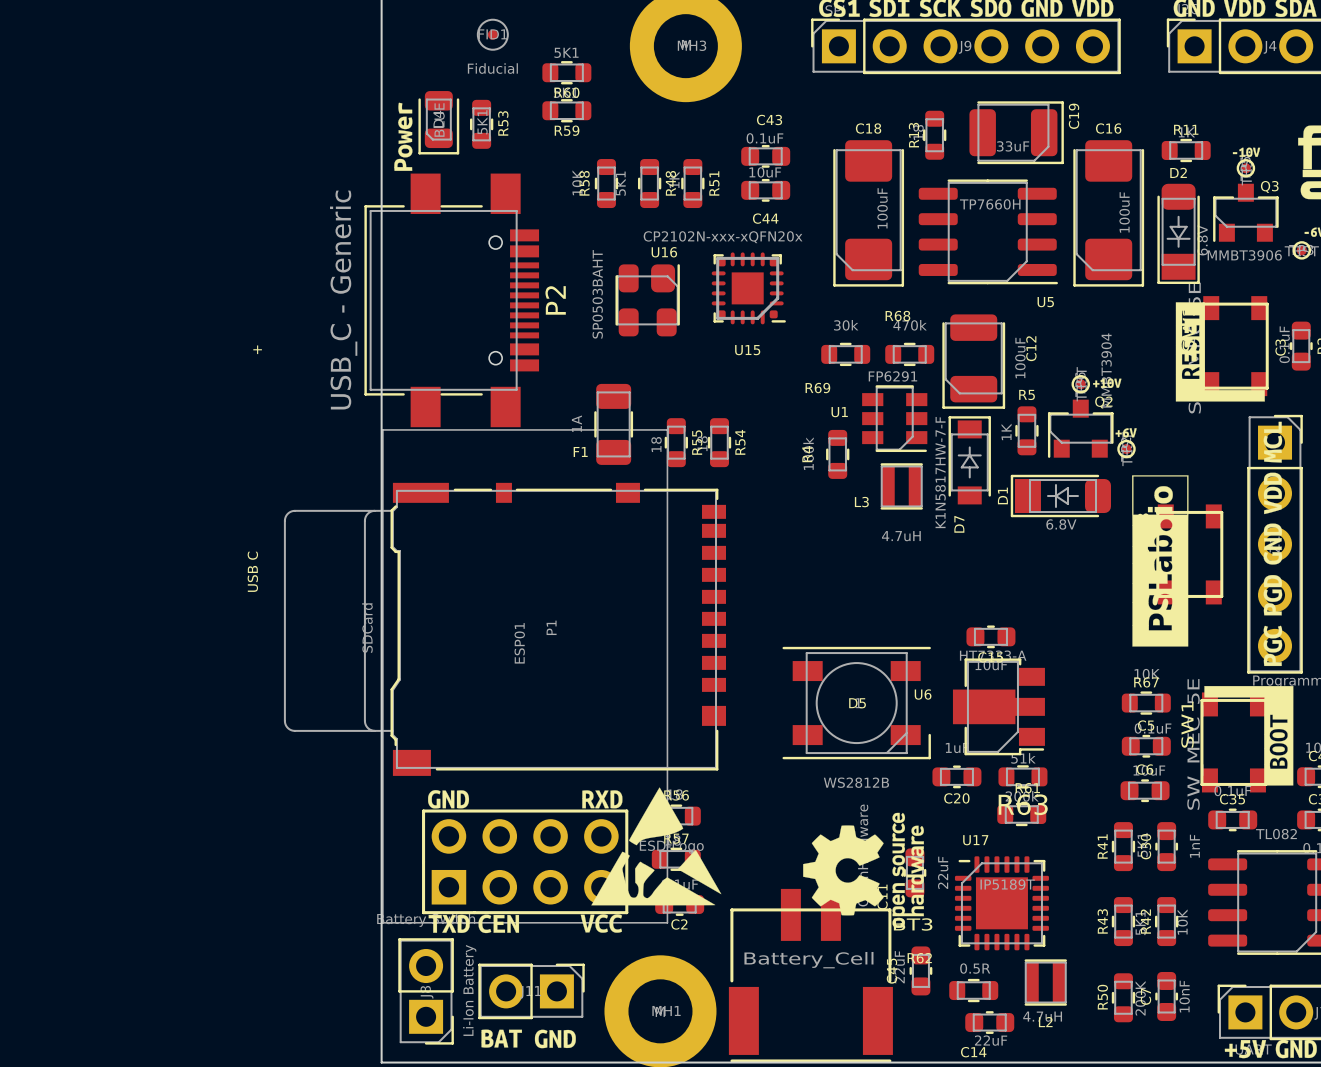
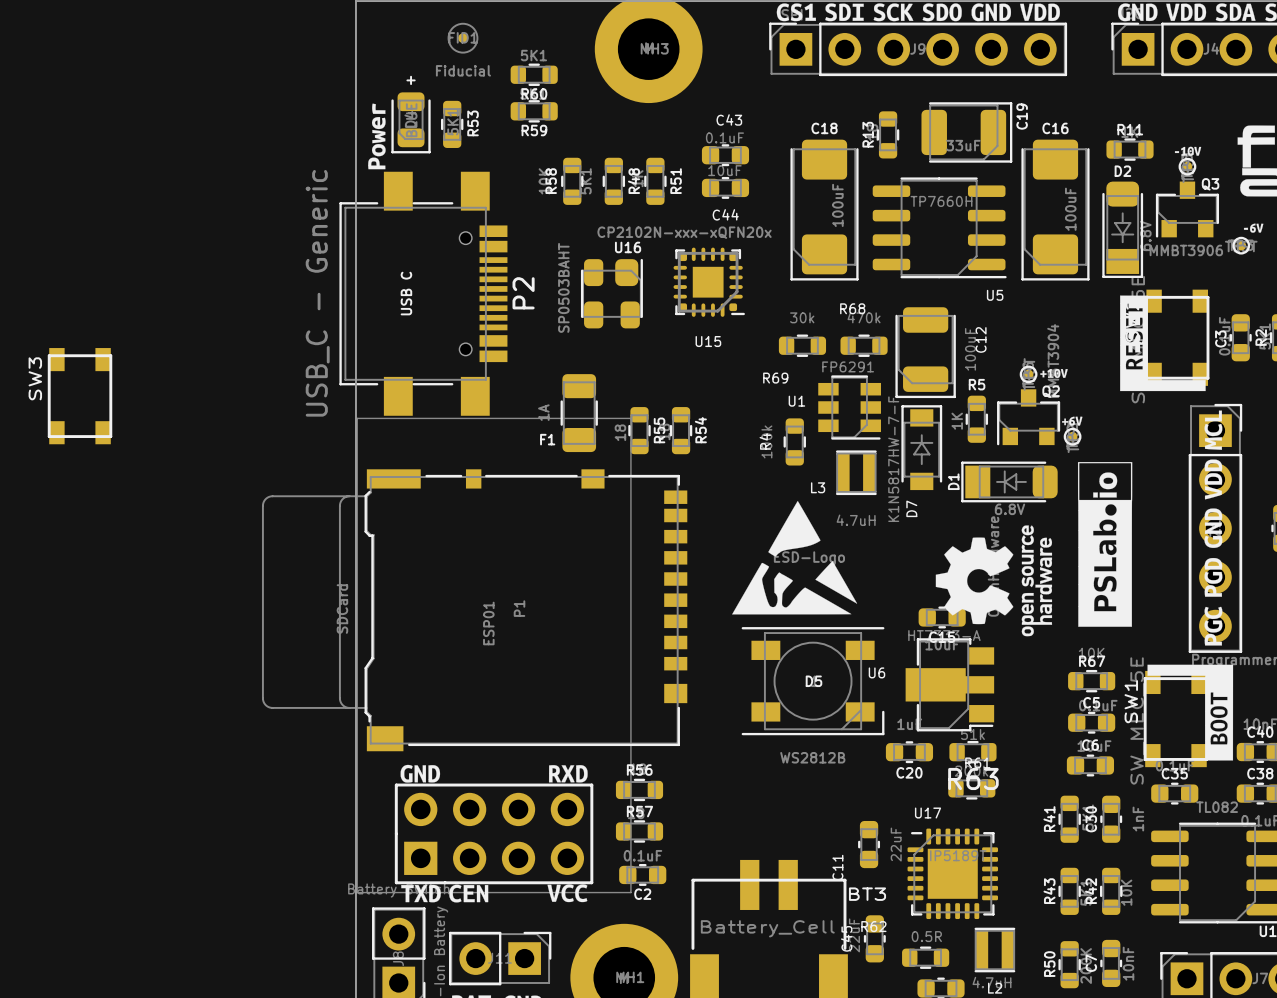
text position: + (257, 349) -> + (411, 80)
SW3 position: (1189, 554) -> (80, 396)
text position: USB C (252, 571) -> USB C (406, 293)
drawing position: (656, 846) -> (794, 557)
drawing position: (863, 870) -> (993, 580)

